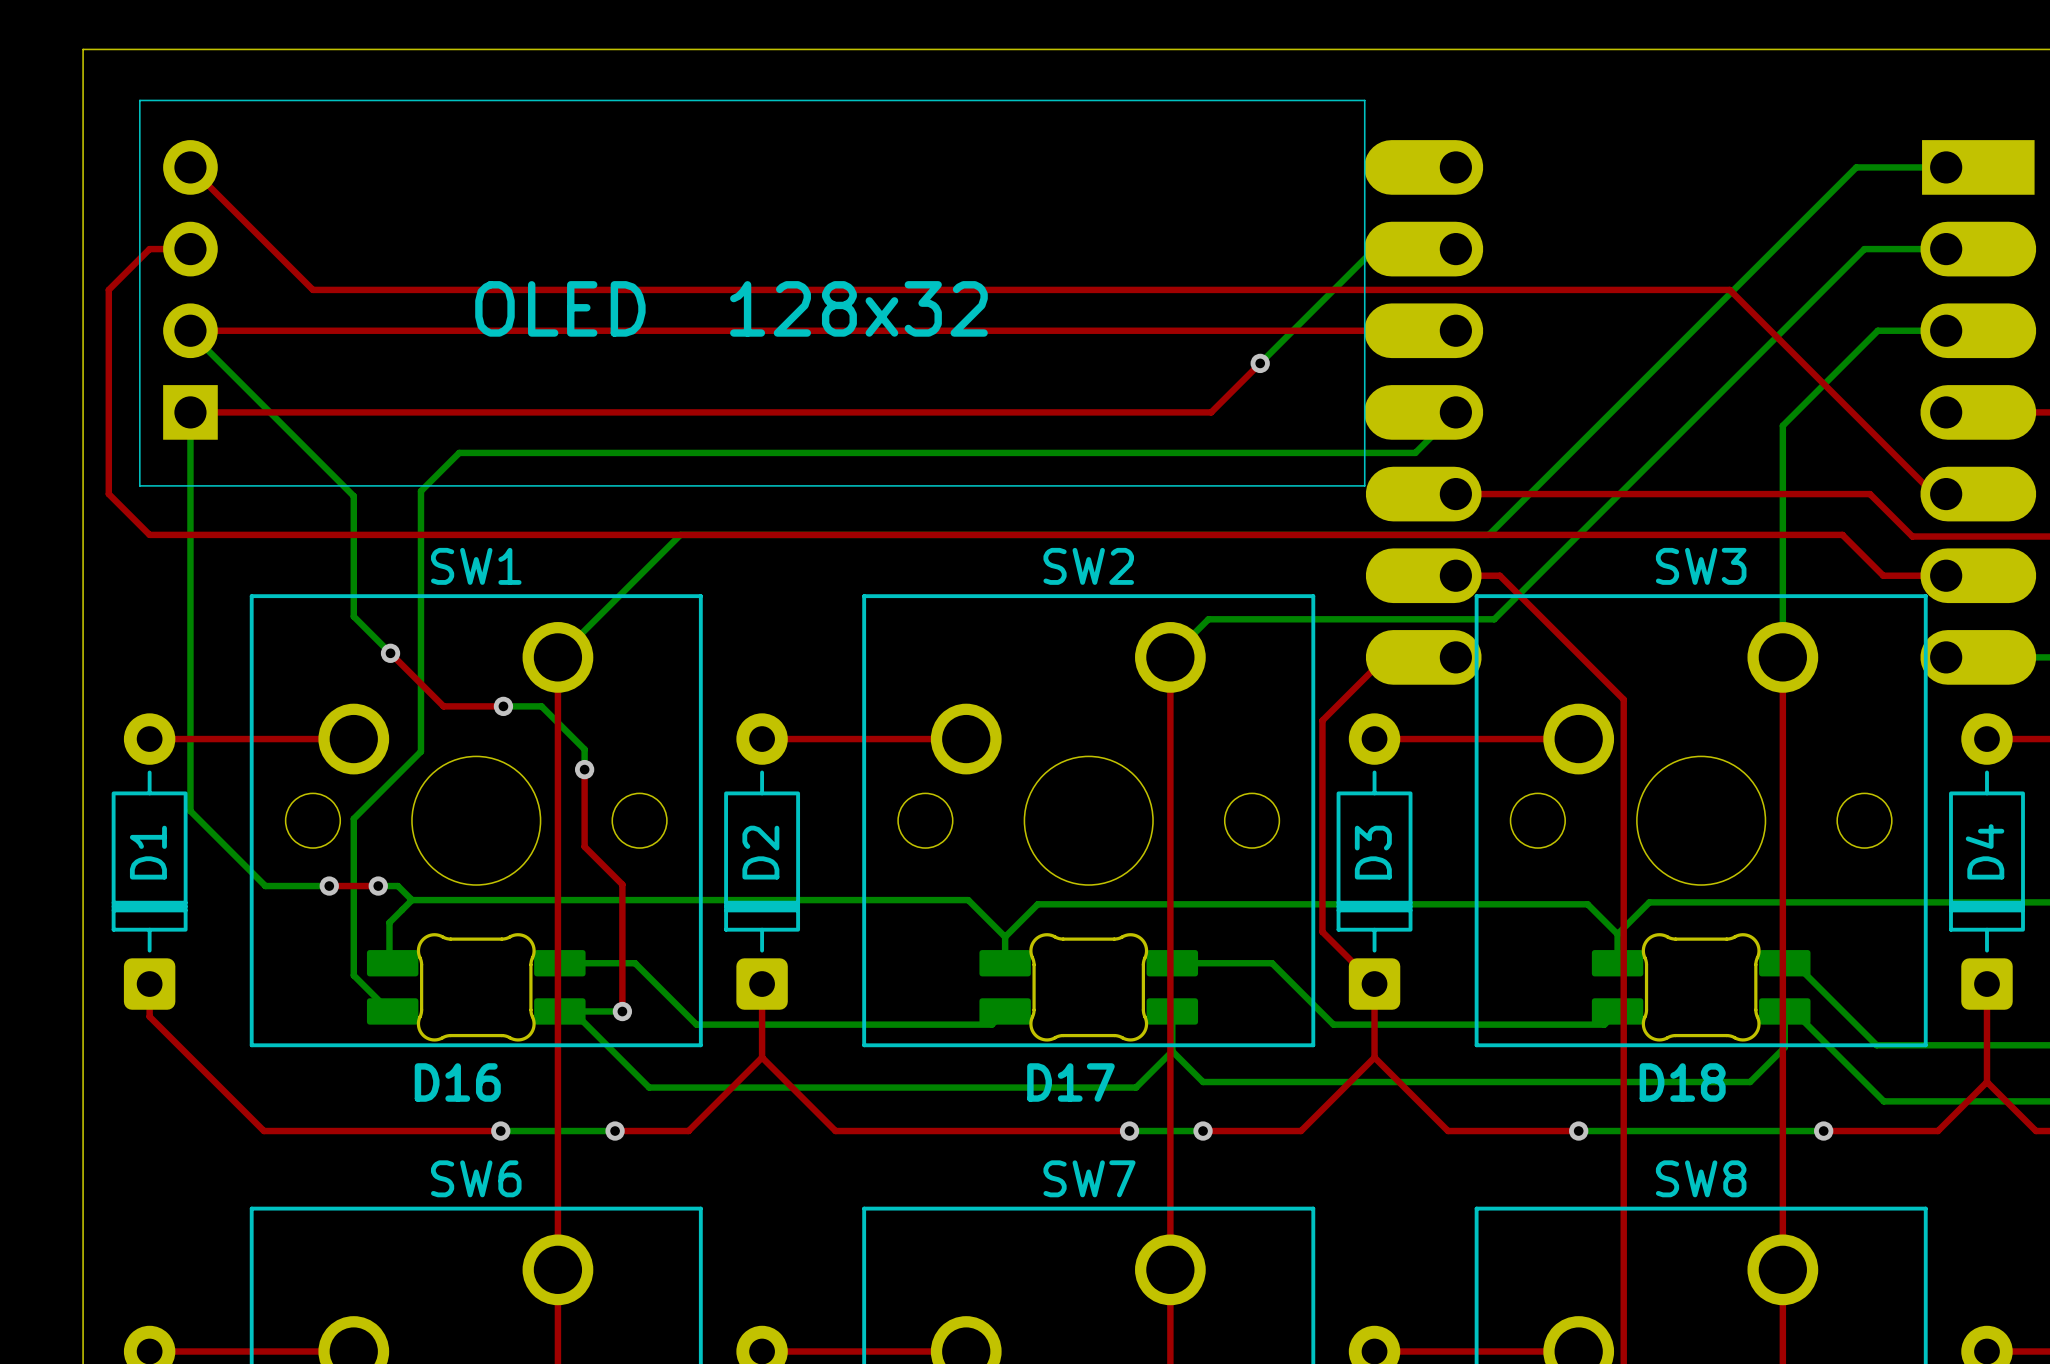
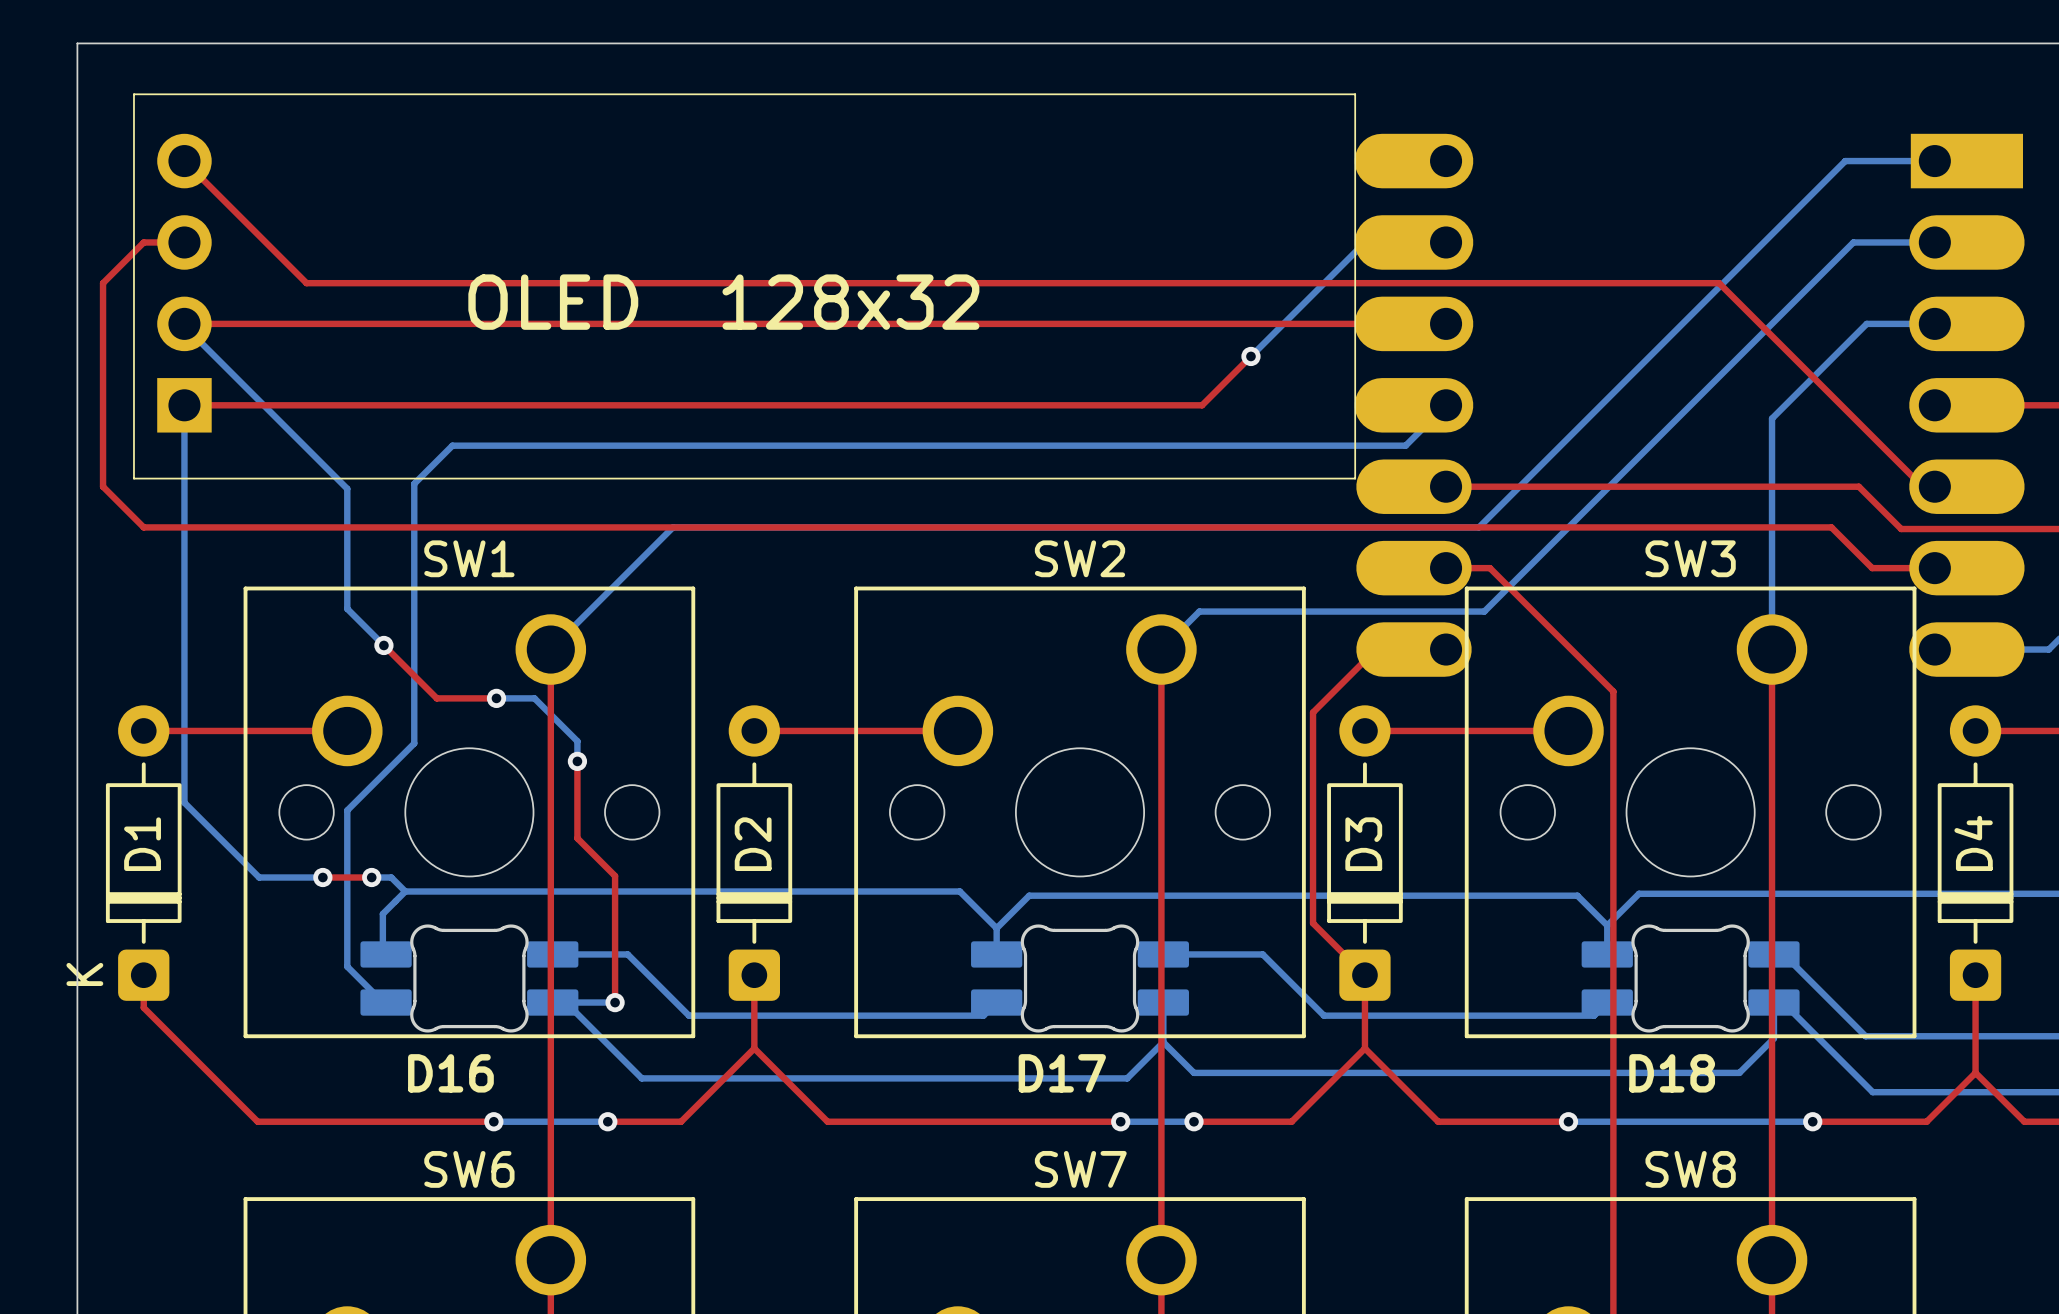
D1 text: none -> K (84, 974)

